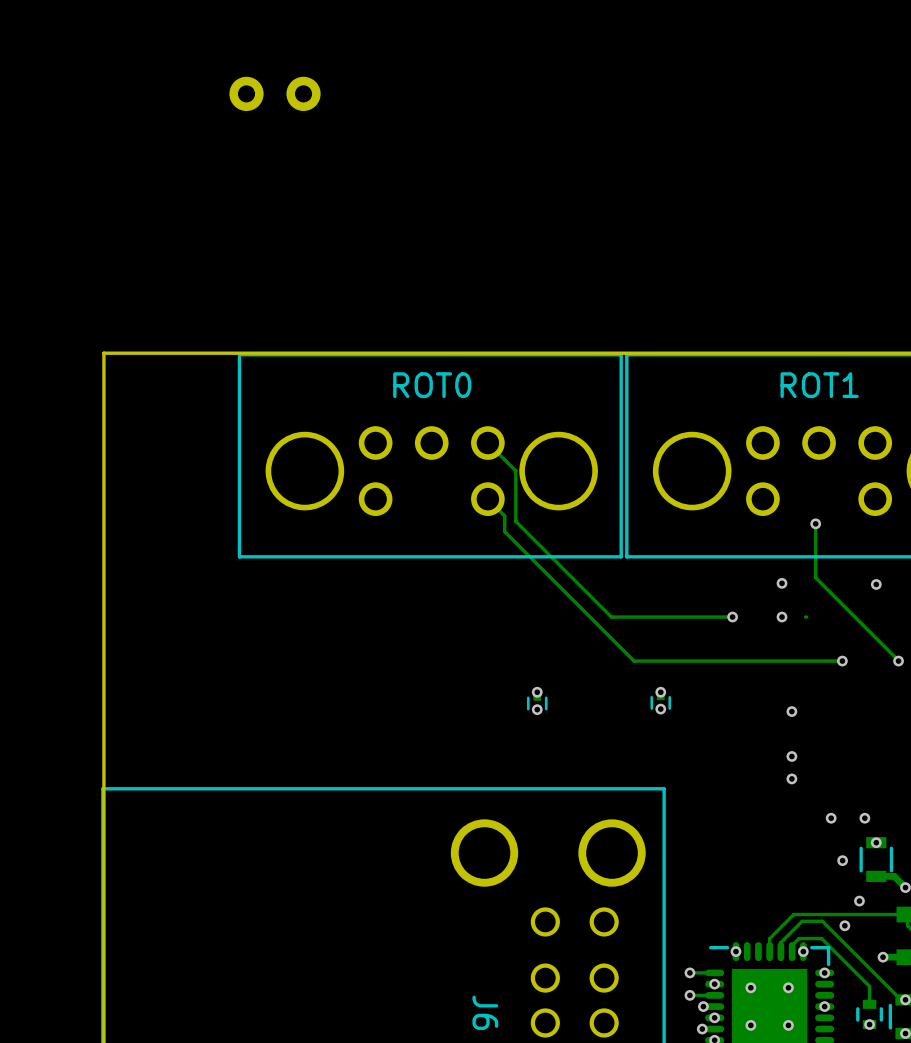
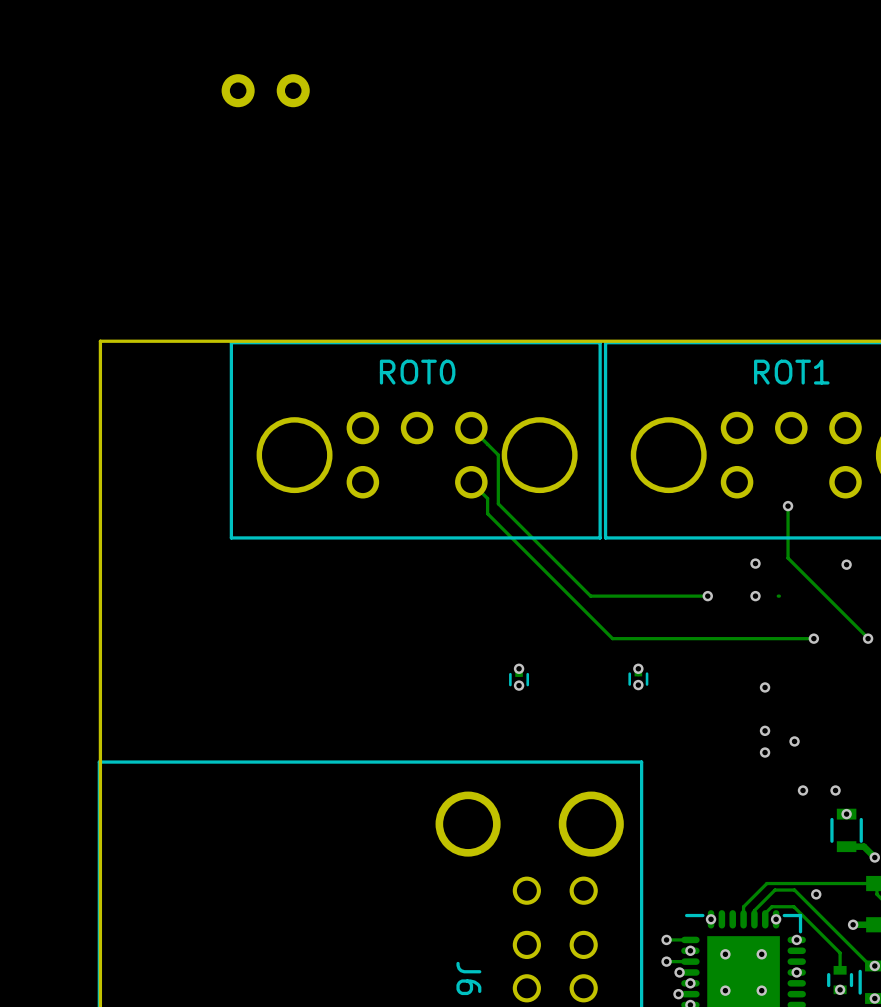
via: none -> (794, 741)
via: (842, 860) -> none
via: (859, 901) -> none

